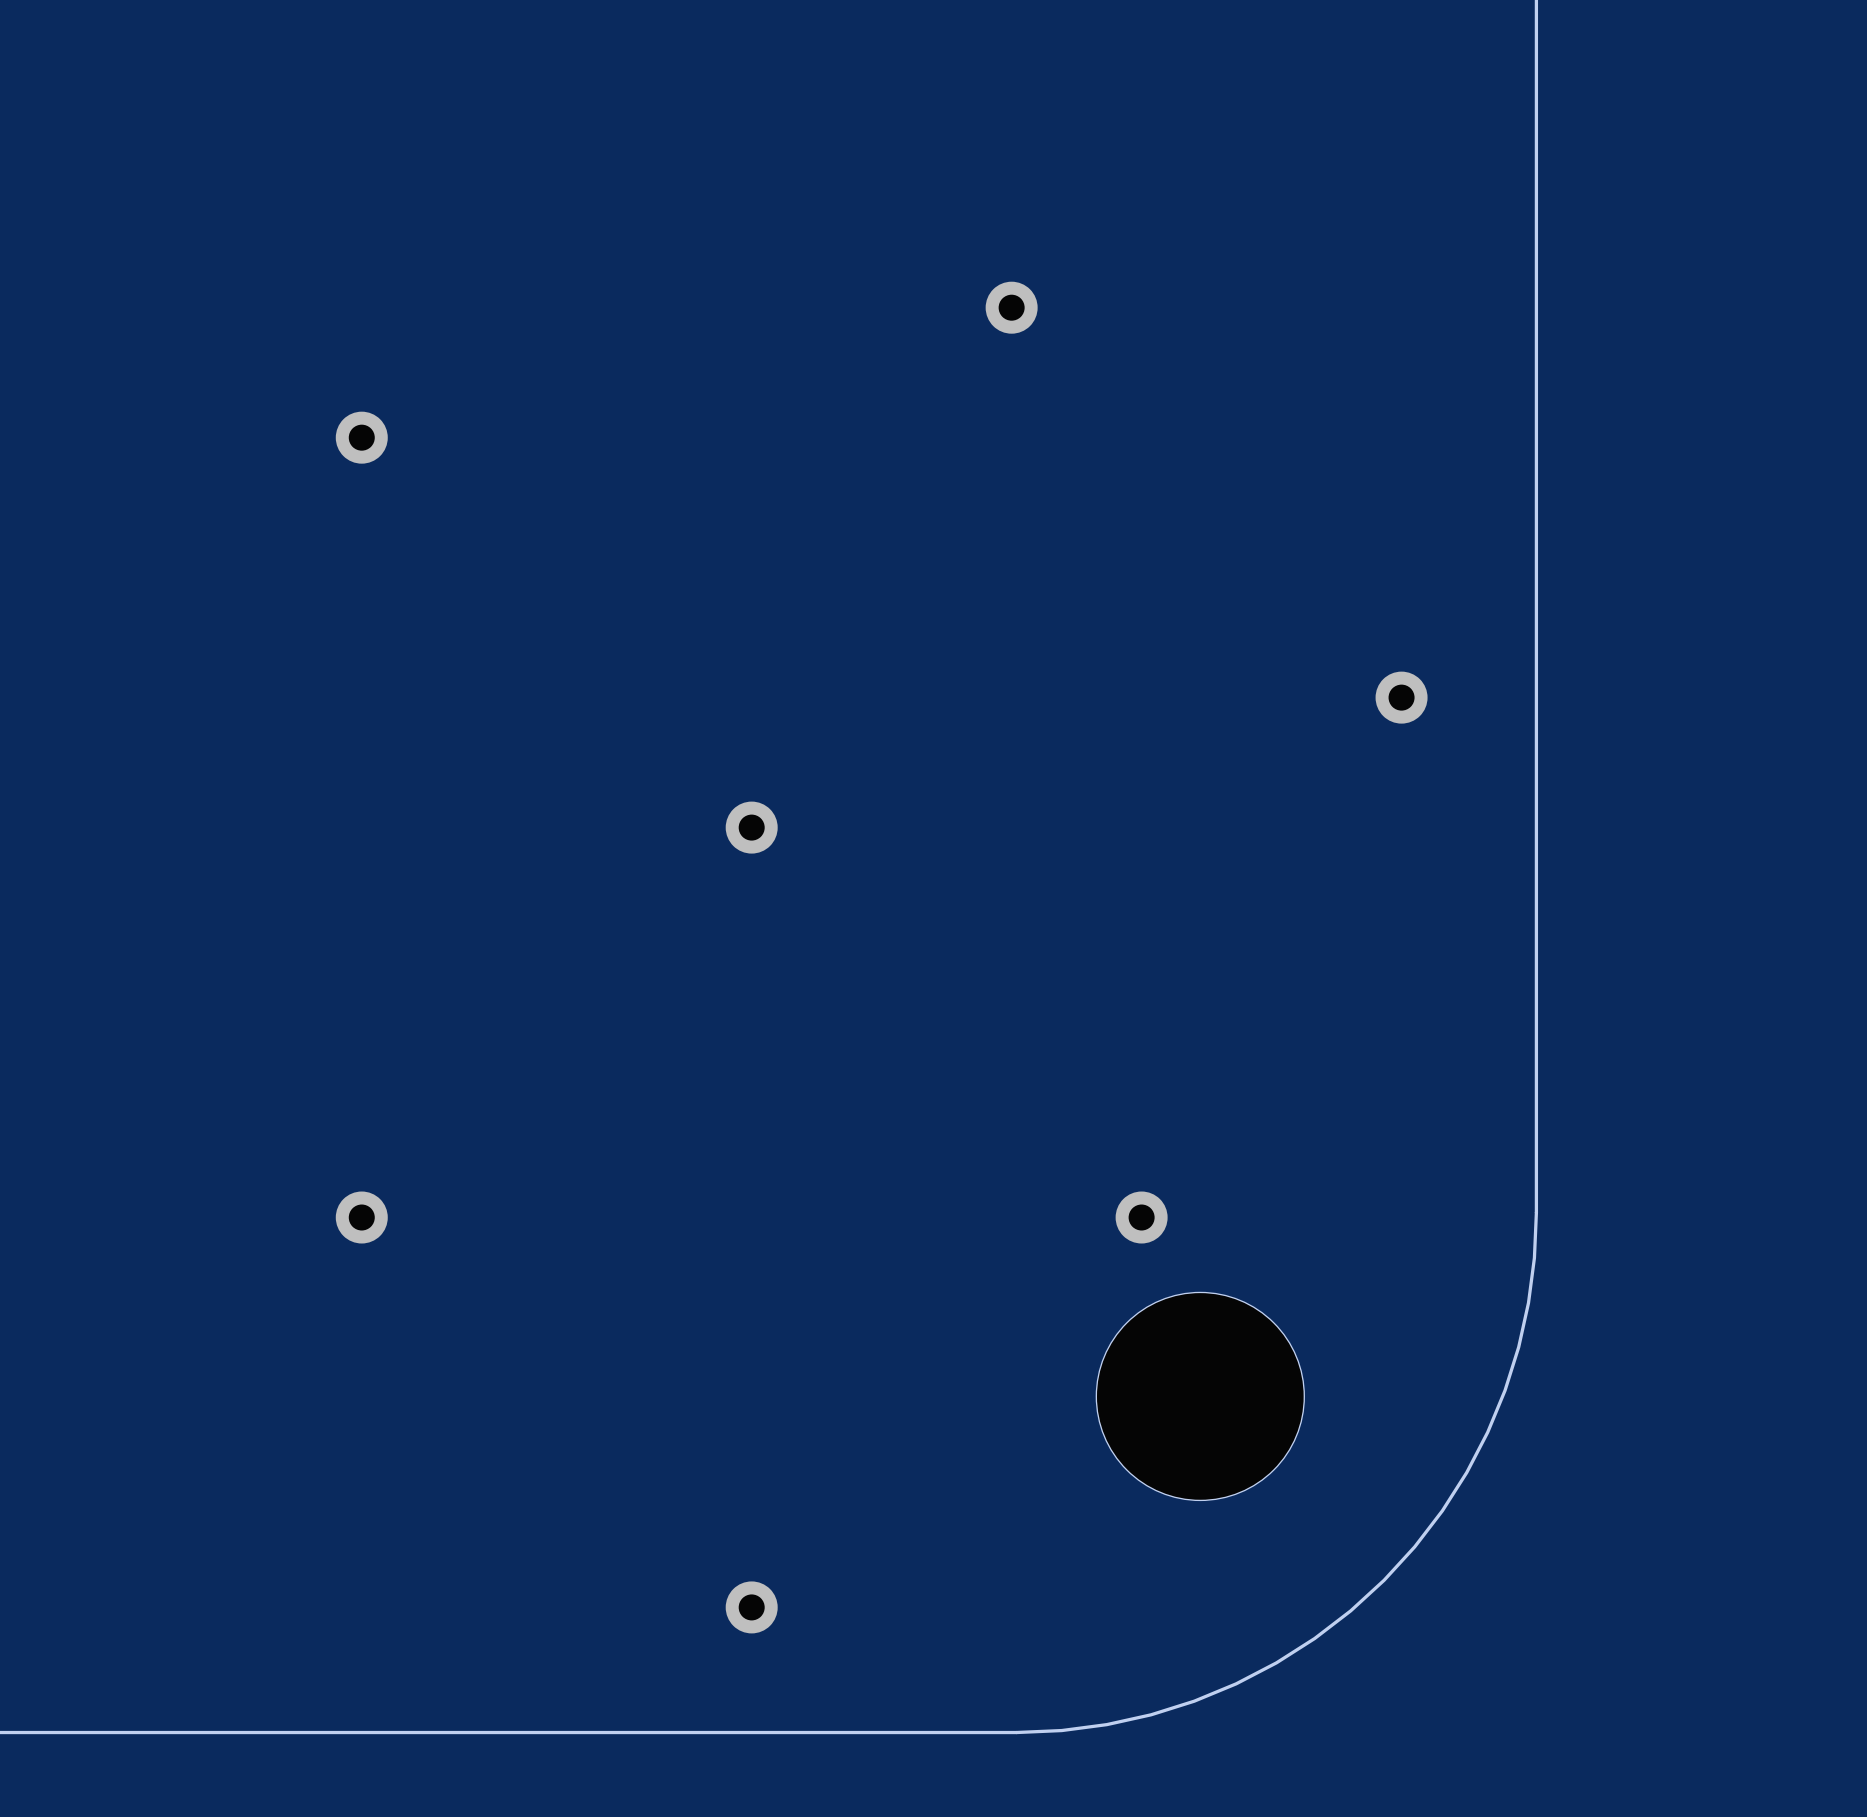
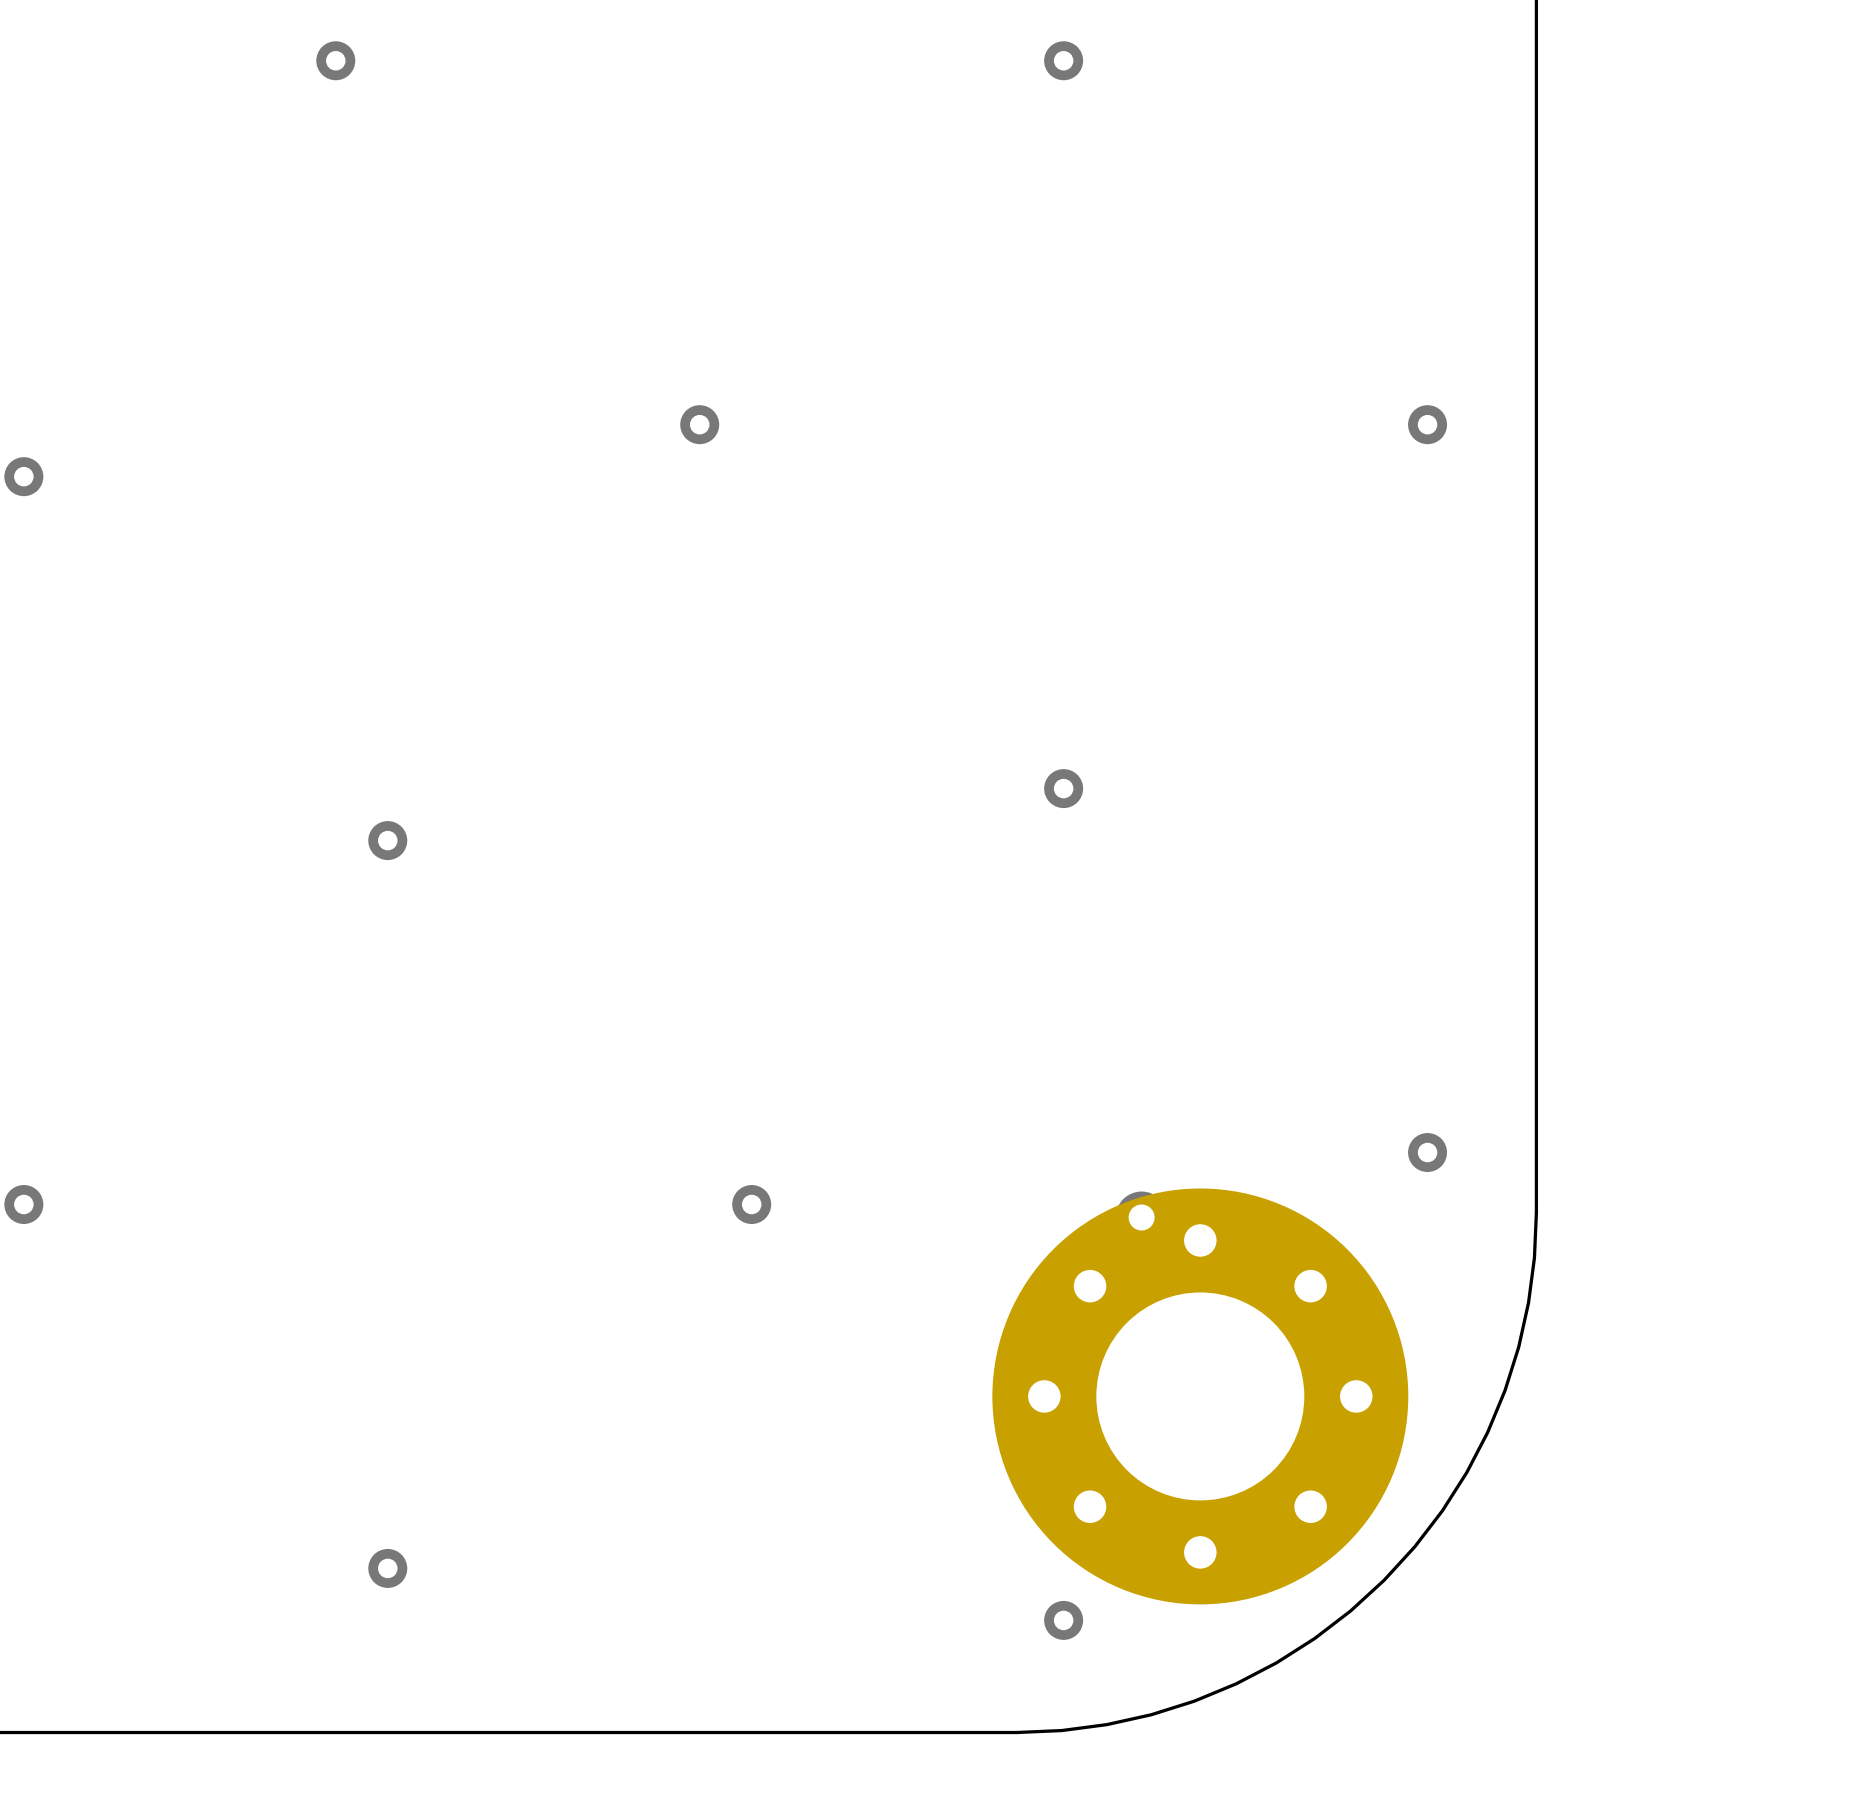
via: none -> (335, 60)
via: none -> (1063, 60)
via: (1011, 307) -> none
via: none -> (699, 424)
via: none -> (1427, 424)
via: (361, 437) -> none
via: none -> (23, 476)
via: (1401, 697) -> none
via: none -> (1063, 788)
via: (751, 827) -> none
via: none -> (387, 840)
via: none -> (1427, 1152)
via: none -> (23, 1204)
via: none -> (751, 1204)
via: (361, 1217) -> none
part footprint: [1096, 1292, 1305, 1501] -> [992, 1188, 1409, 1605]
via: none -> (387, 1568)
via: (751, 1607) -> none
via: none -> (1063, 1620)

